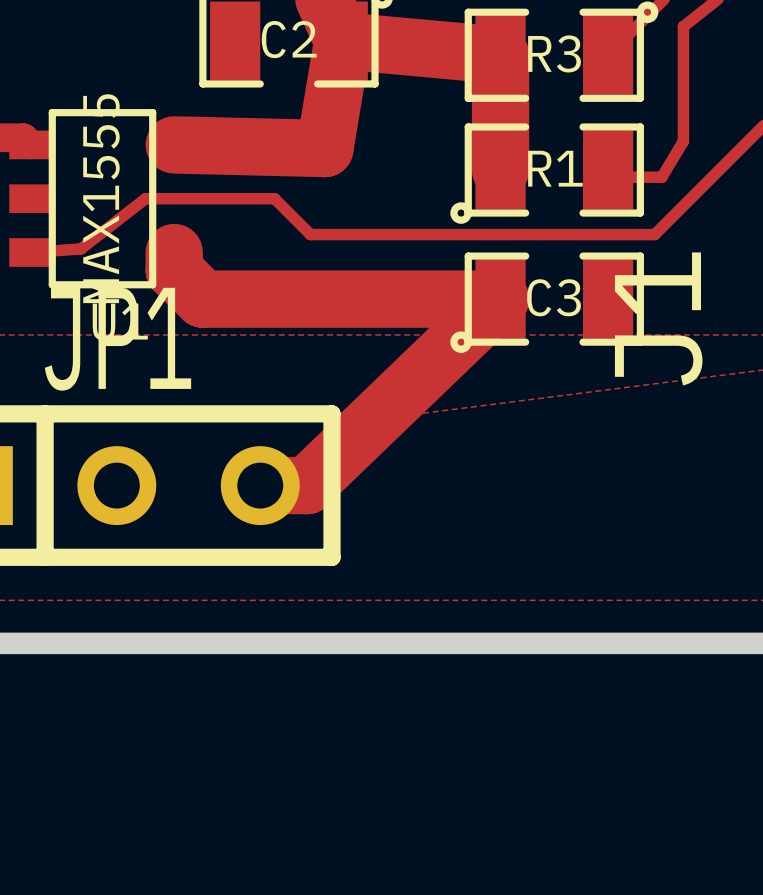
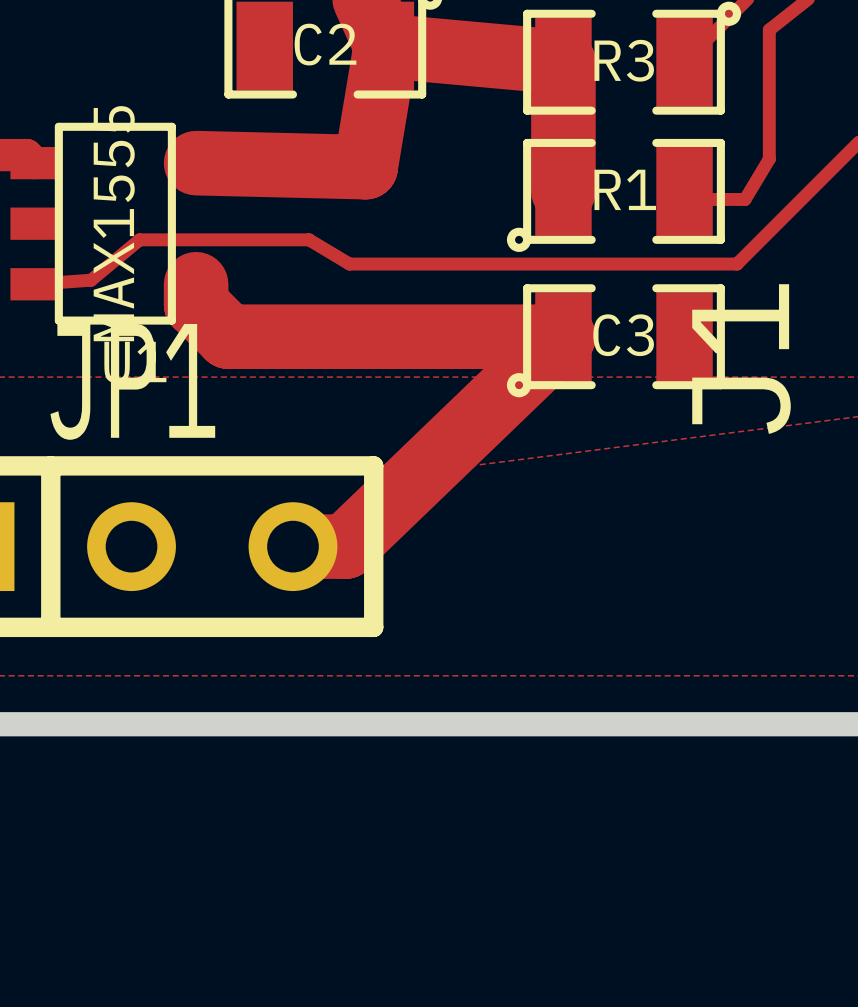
top track: (310, 234) (274, 198) (145, 198) (80, 248) -> (349, 264) (309, 239) (139, 239) (91, 280)

